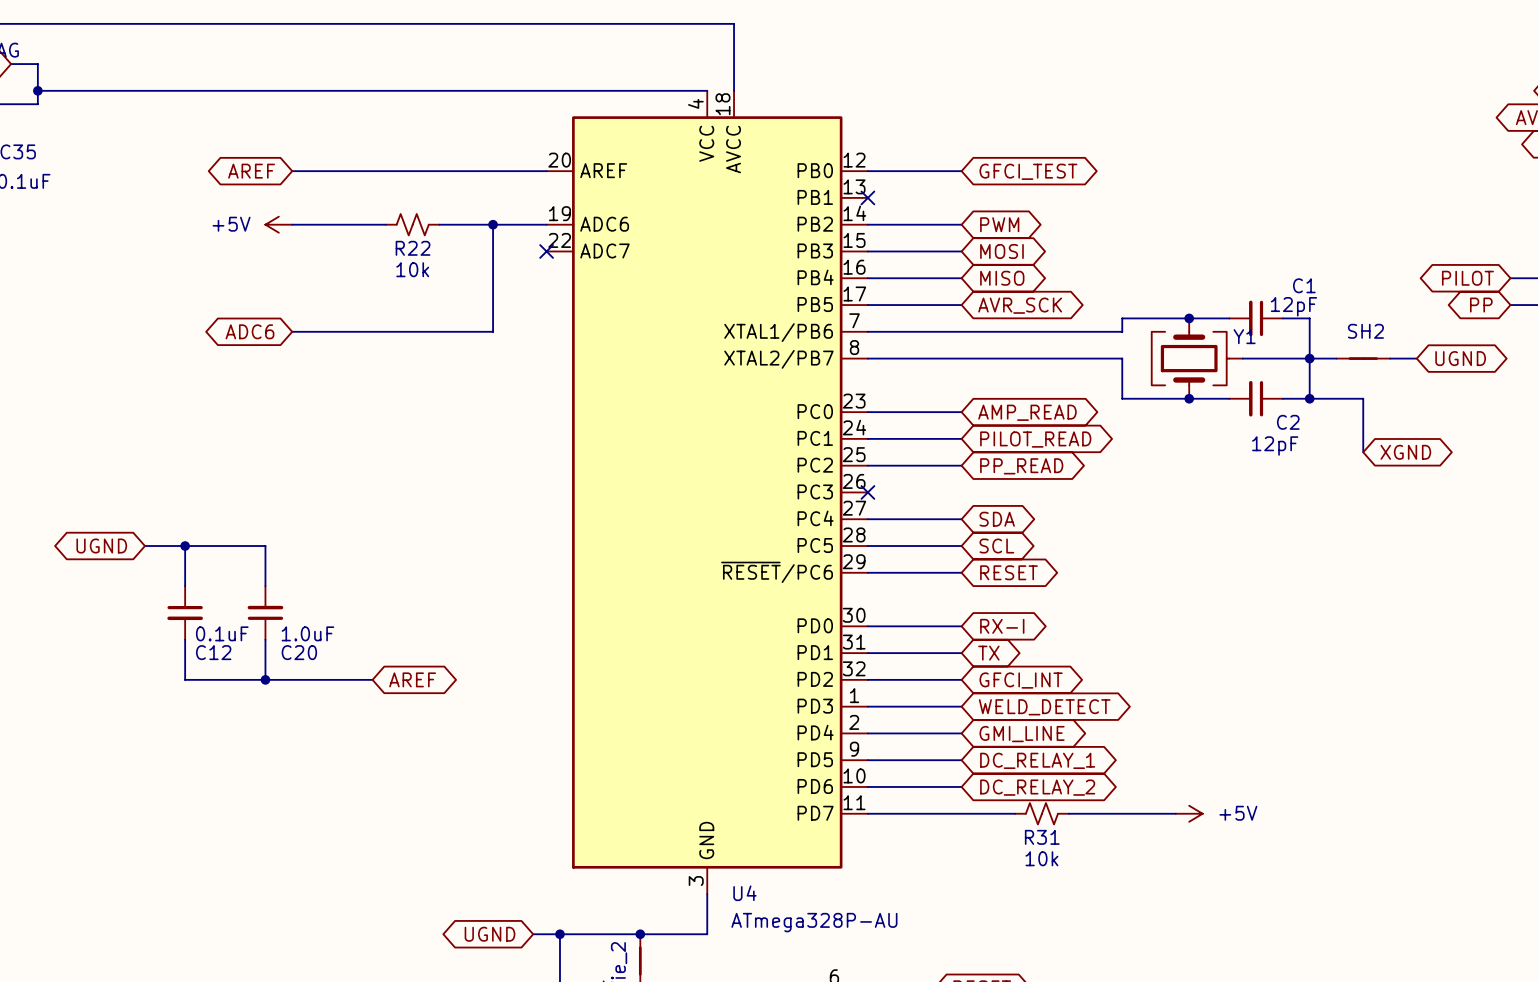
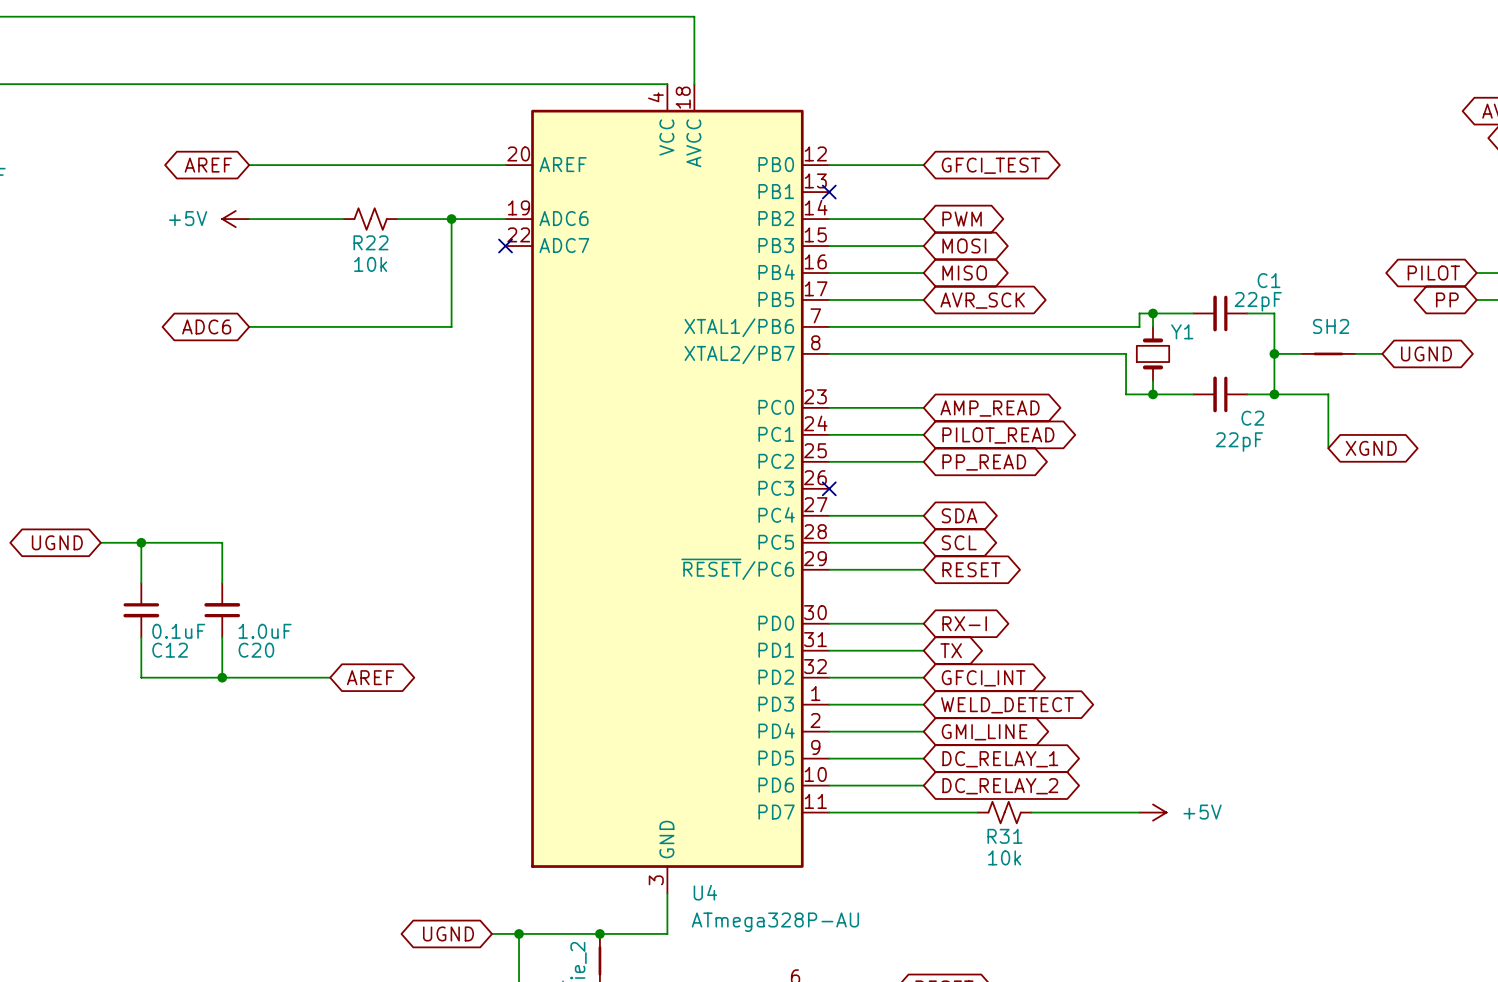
C1 value: 12pF (1293, 306) -> 22pF (1258, 301)
Y1 symbol: [1151, 318, 1243, 399] -> [1136, 326, 1170, 381]
wire: (1175, 318) (1122, 318) (1122, 331) -> (1139, 313) (1139, 326) (1085, 326)
Y1 name position: Y1 (1244, 336) -> Y1 (1182, 331)
wire: (1122, 358) (1122, 398) (1162, 398) -> (1085, 353) (1126, 353) (1126, 394)
wire: (1242, 358) (1309, 358) -> none
C2 value: 12pF (1275, 445) -> 22pF (1239, 442)

